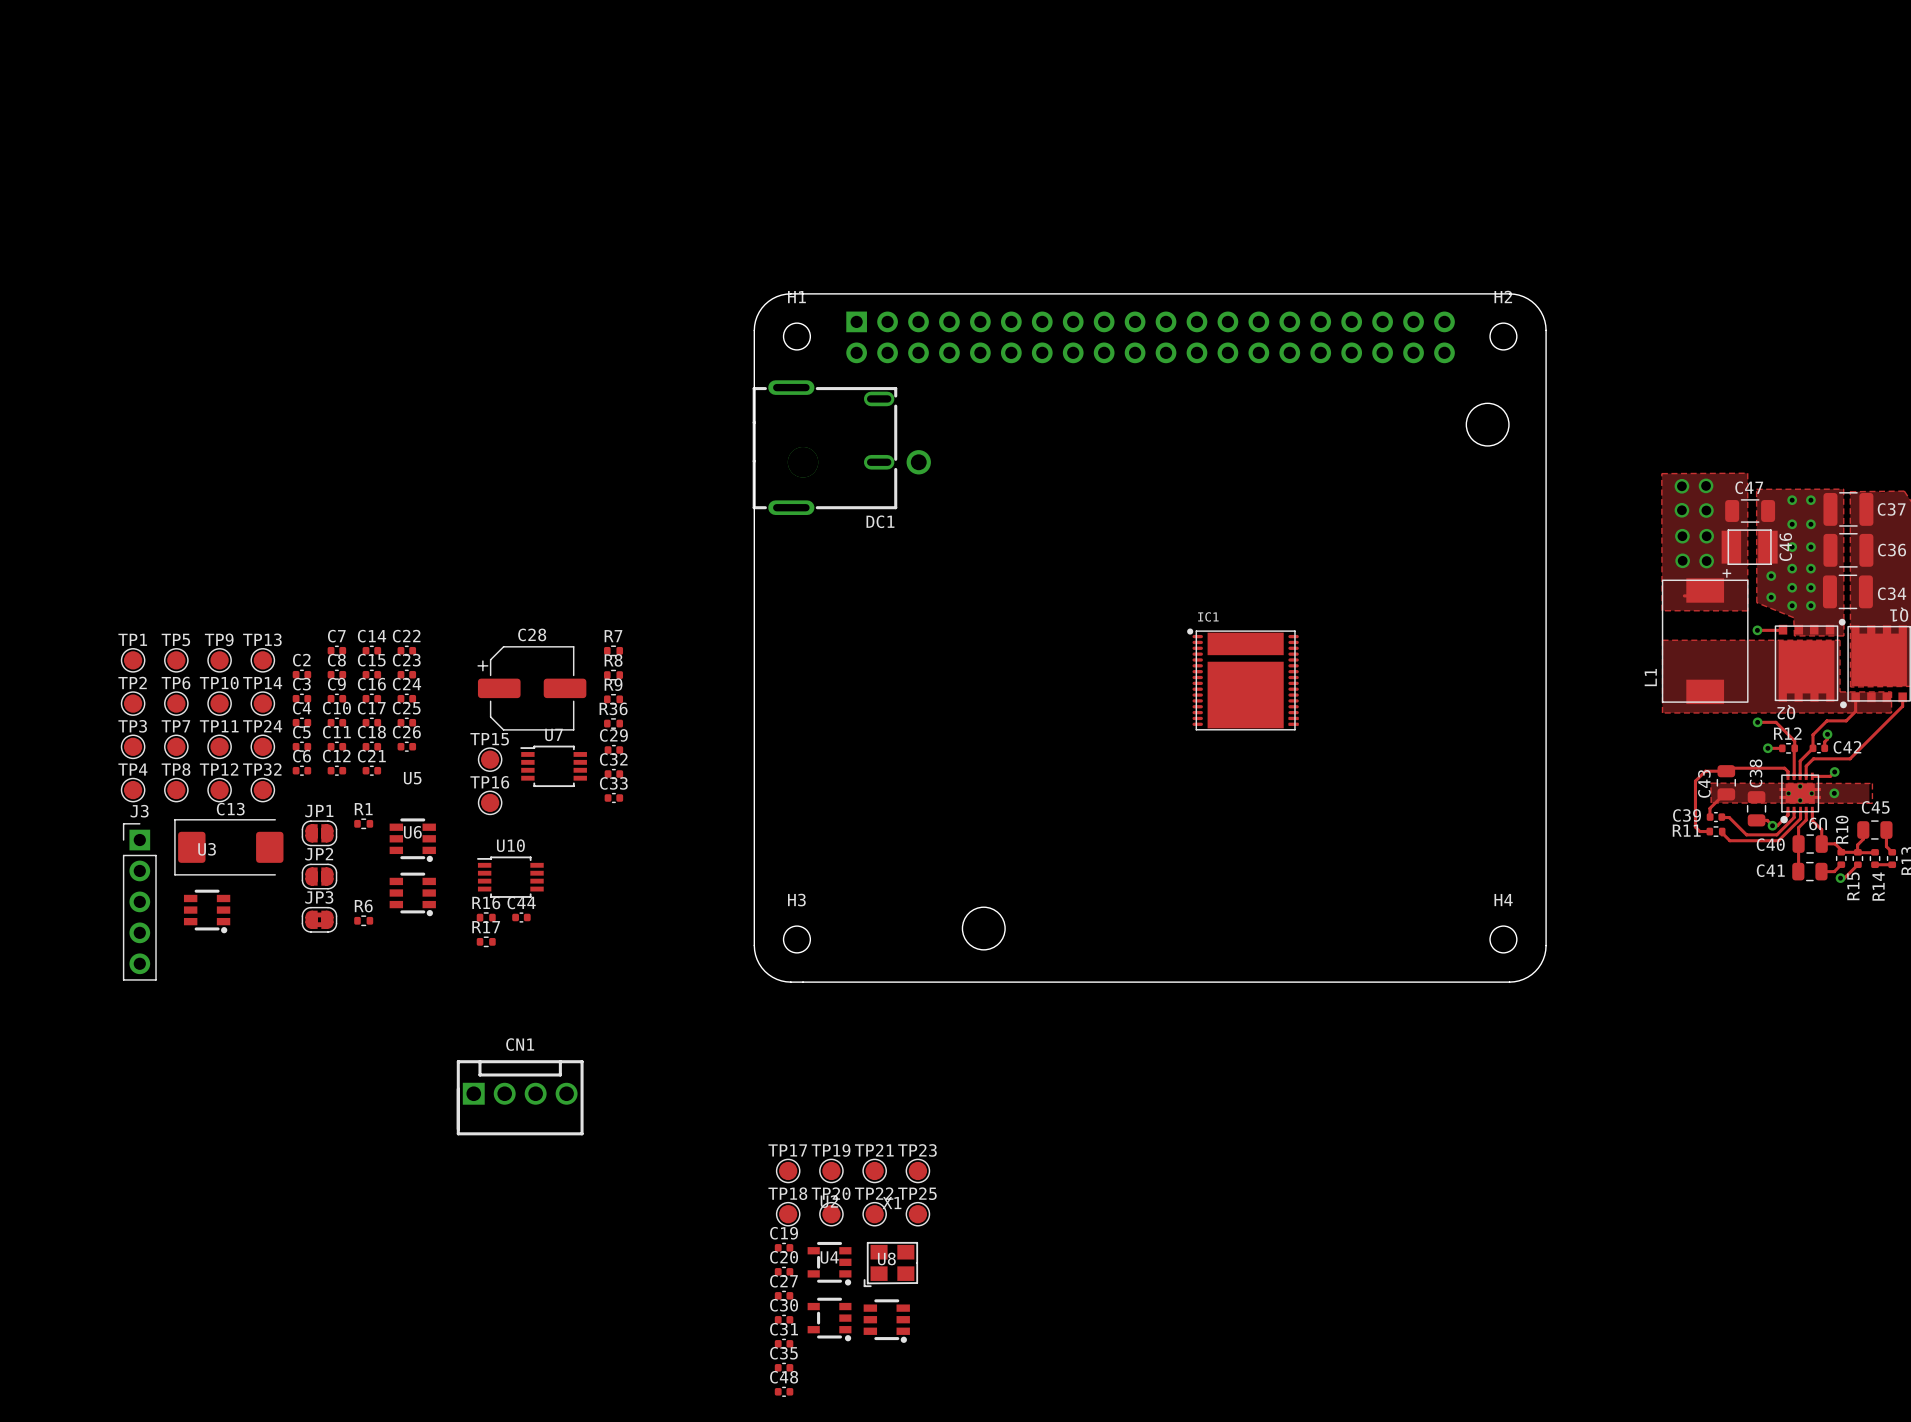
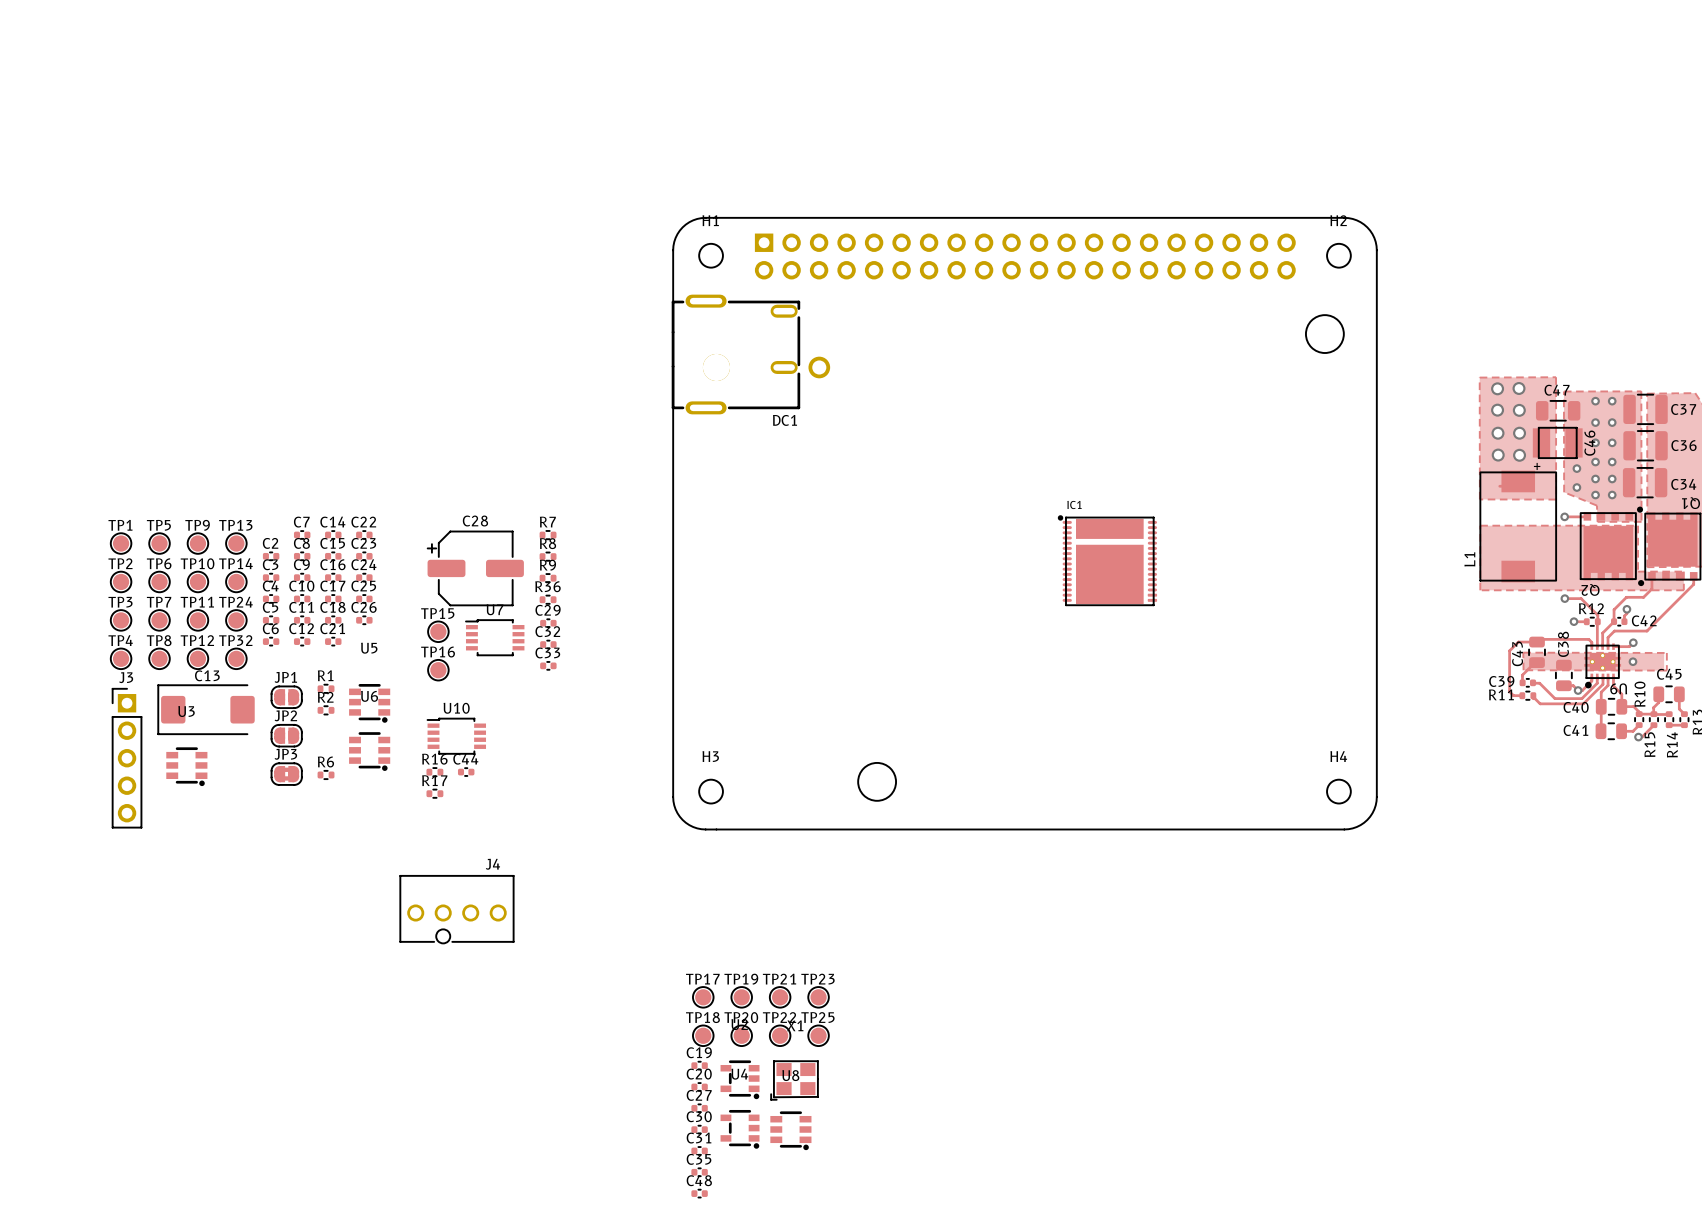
R2: none -> (326, 710)
J4: none -> (456, 909)
CN1: (520, 1097) -> none

